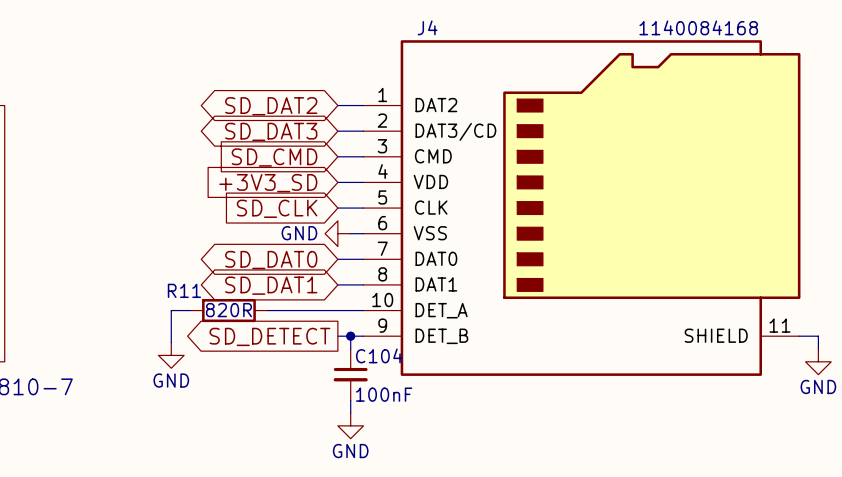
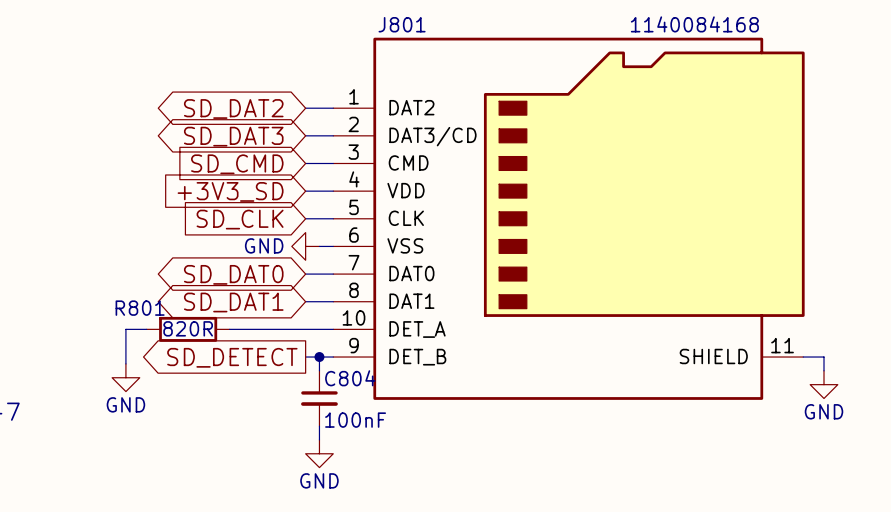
J4 name: J4 (427, 27) -> J801 (402, 24)
R11 name: R11 (184, 290) -> R801 (140, 308)
C104 name: C104 (379, 355) -> C804 (350, 378)

